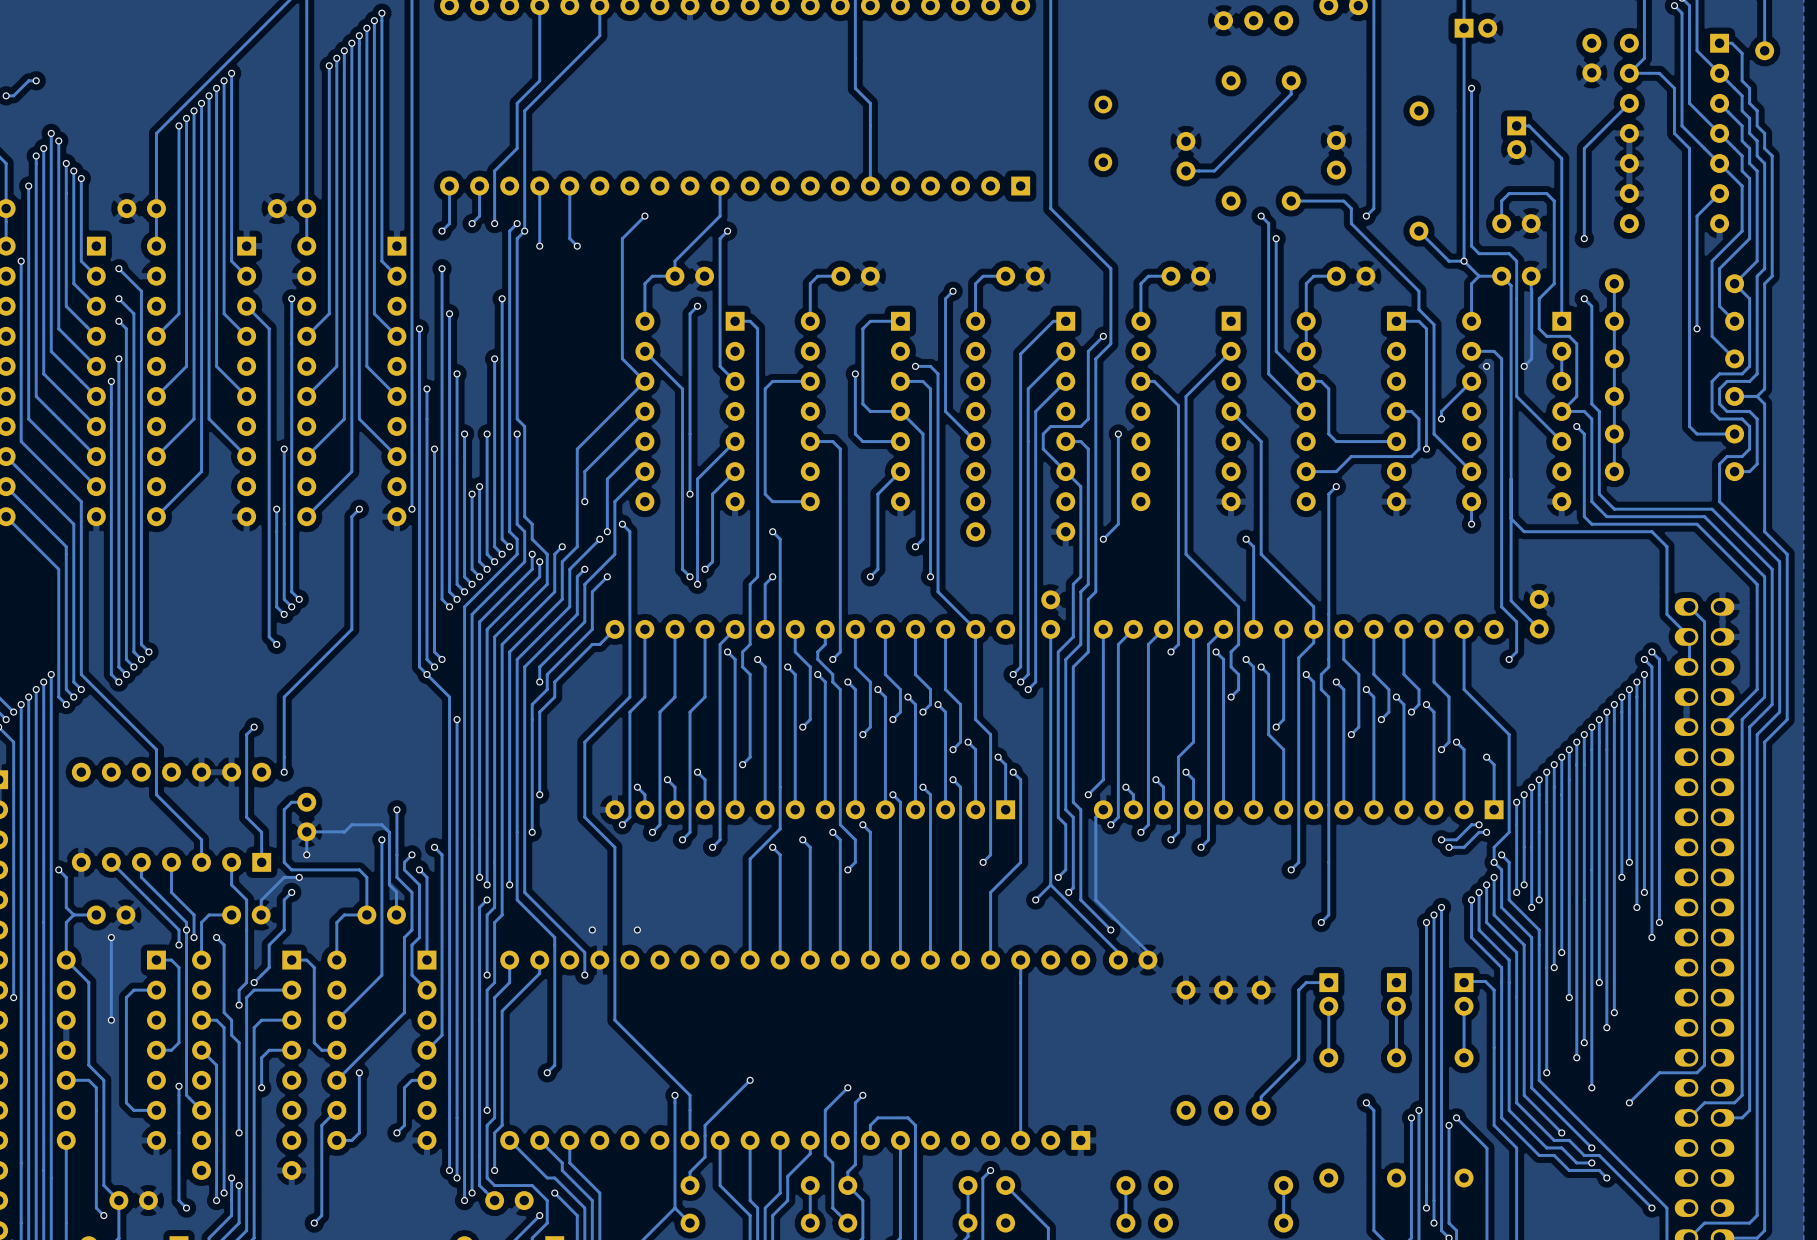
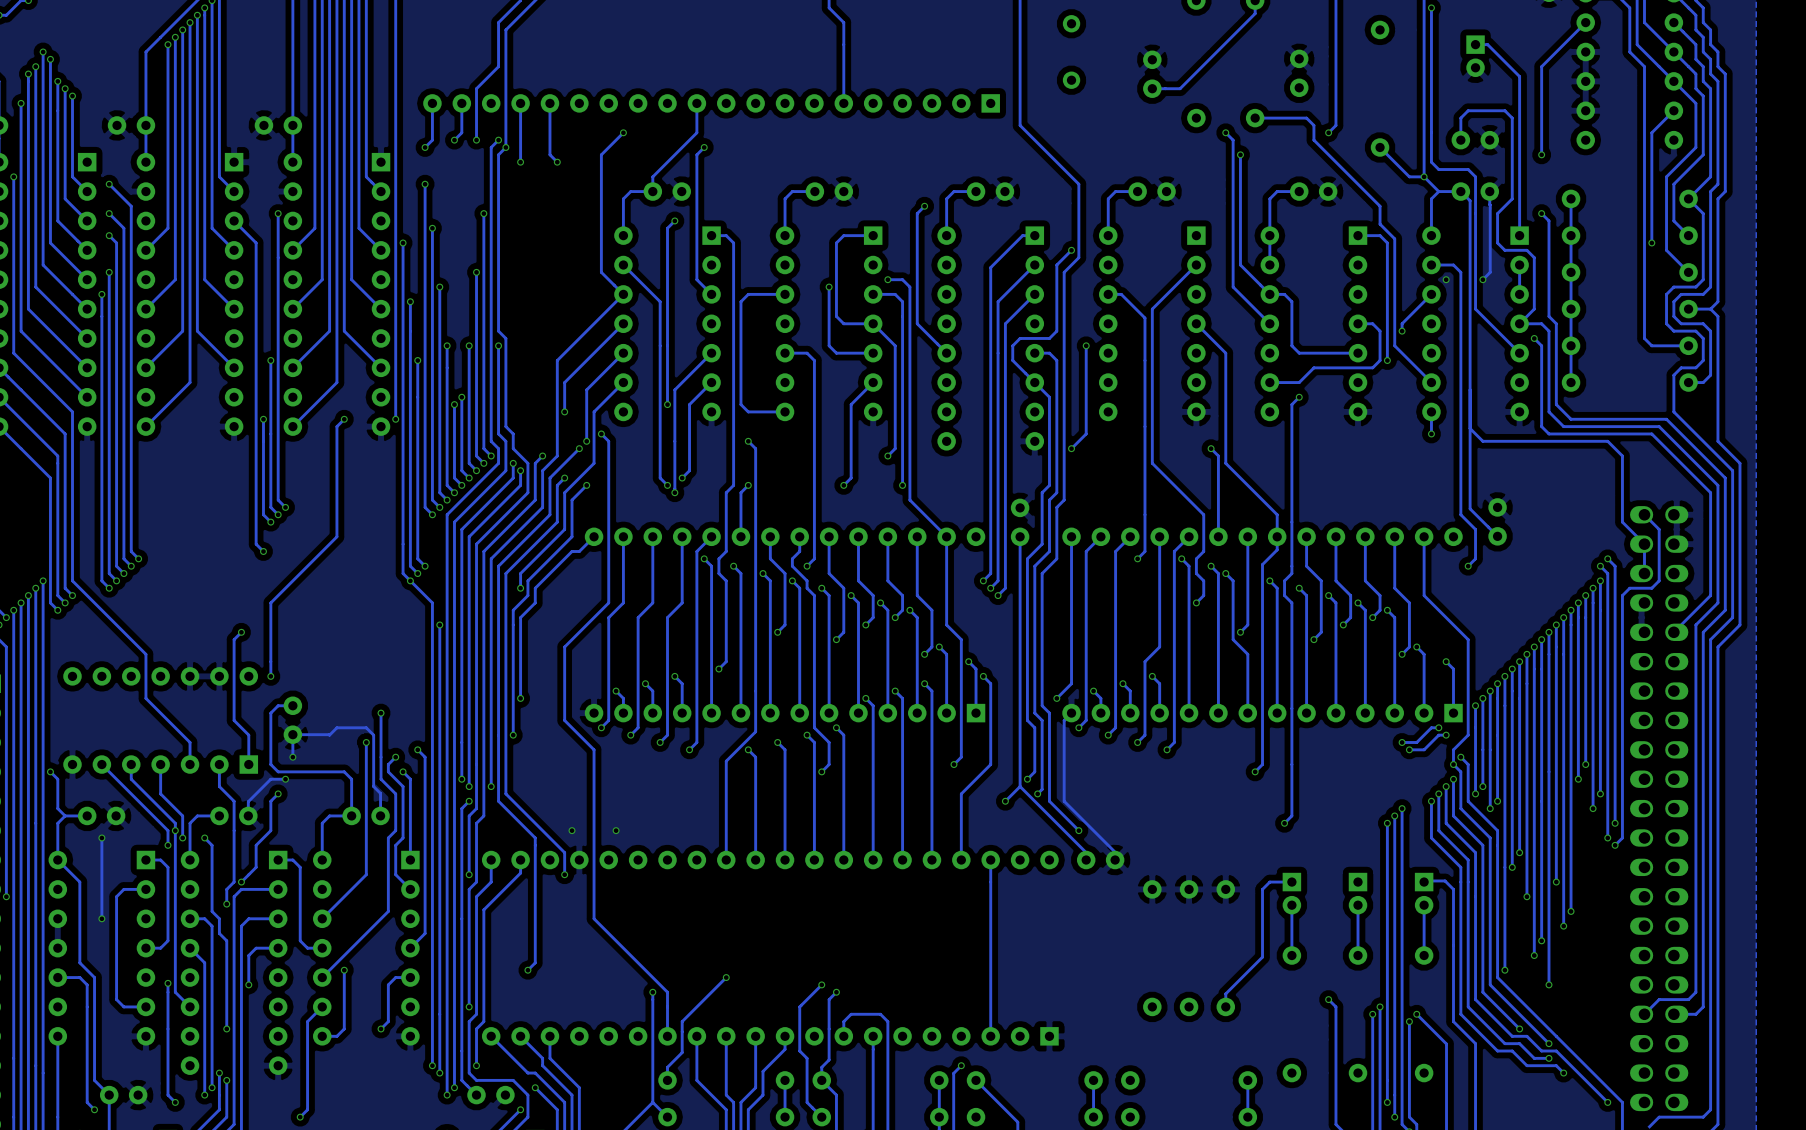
track: (1704, 674) (1704, 1065) (1697, 1072) (1659, 1072) (1629, 1102) -> (1659, 580) (1651, 588) (1629, 588) (1622, 595) (1622, 837) (1615, 845)
via: none -> (1615, 845)
via: (1629, 1102) -> none

